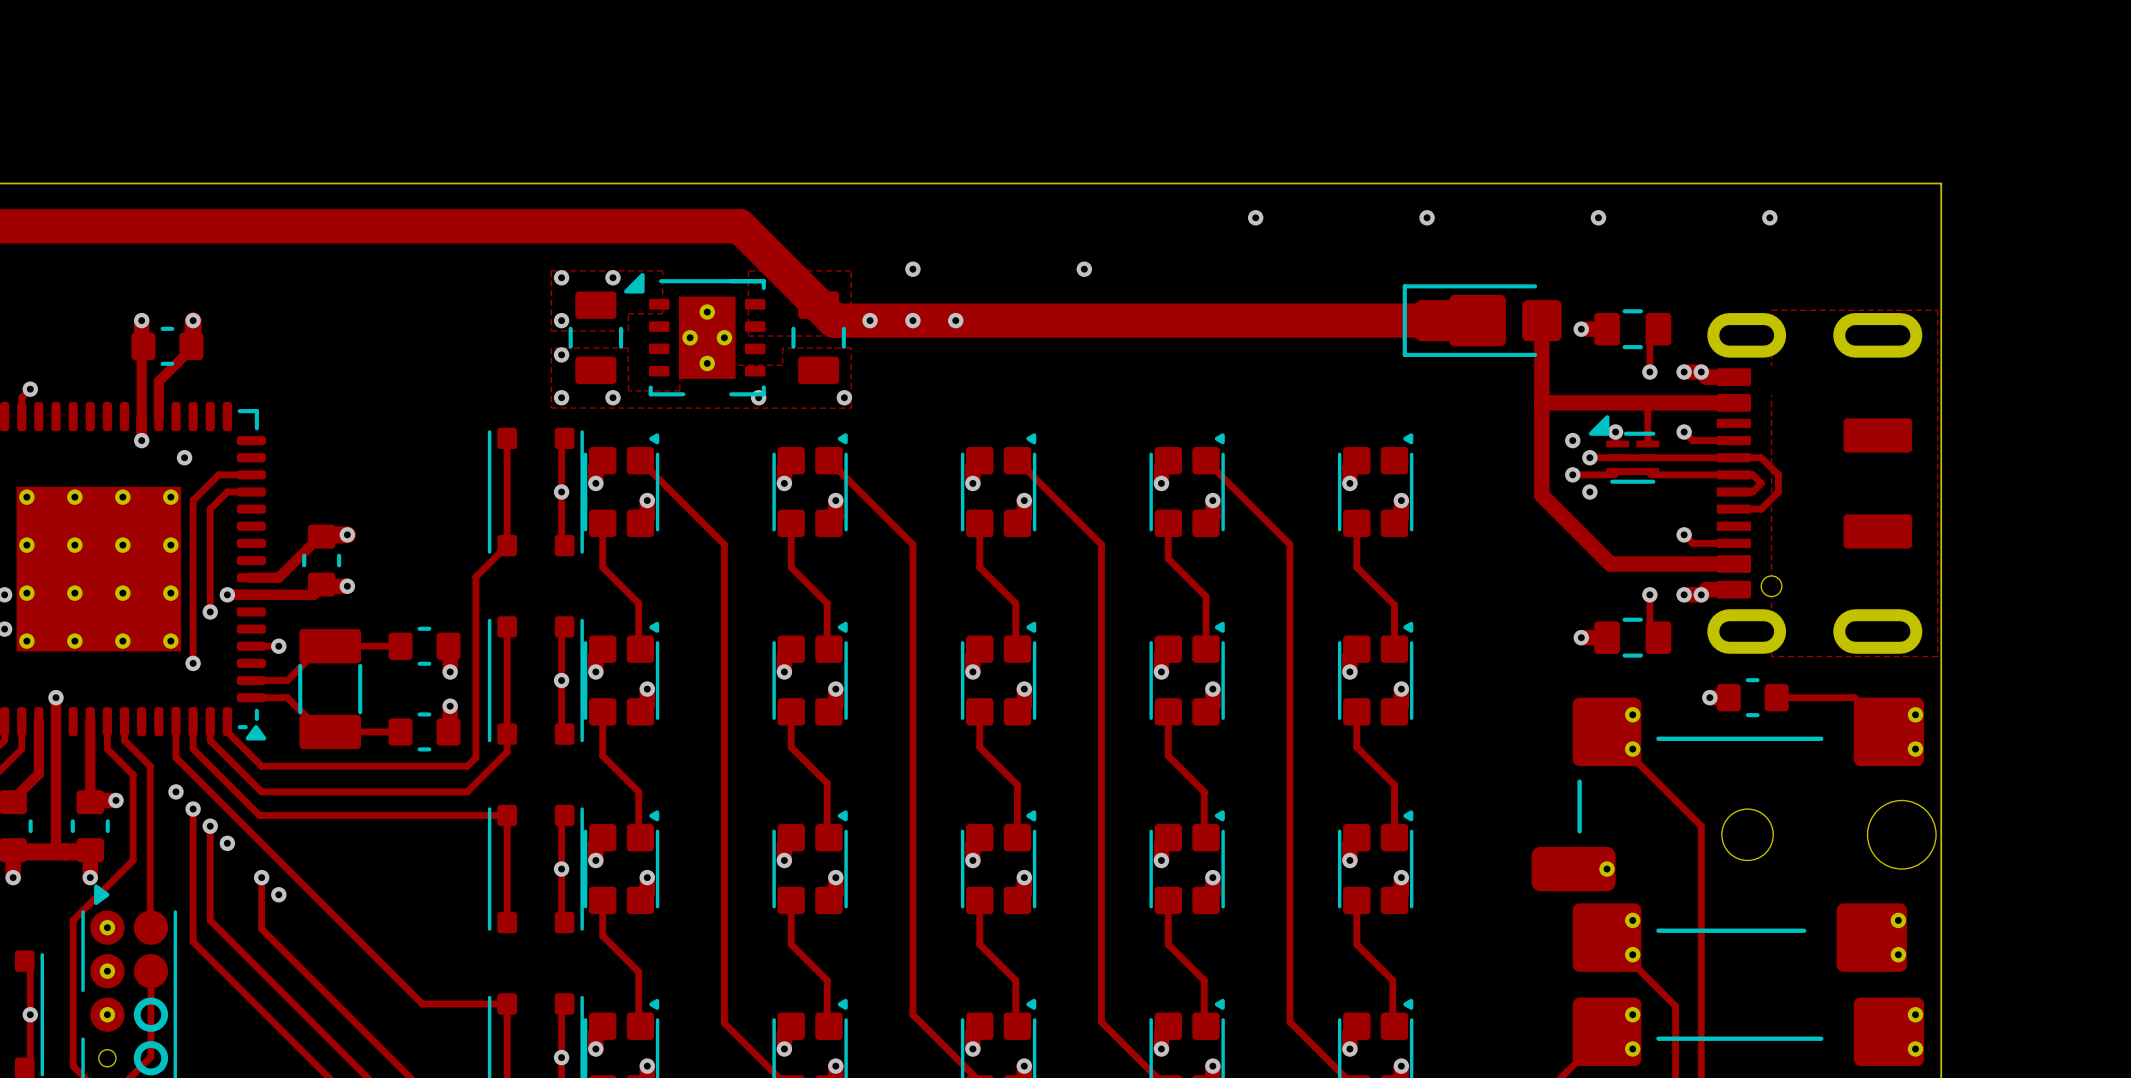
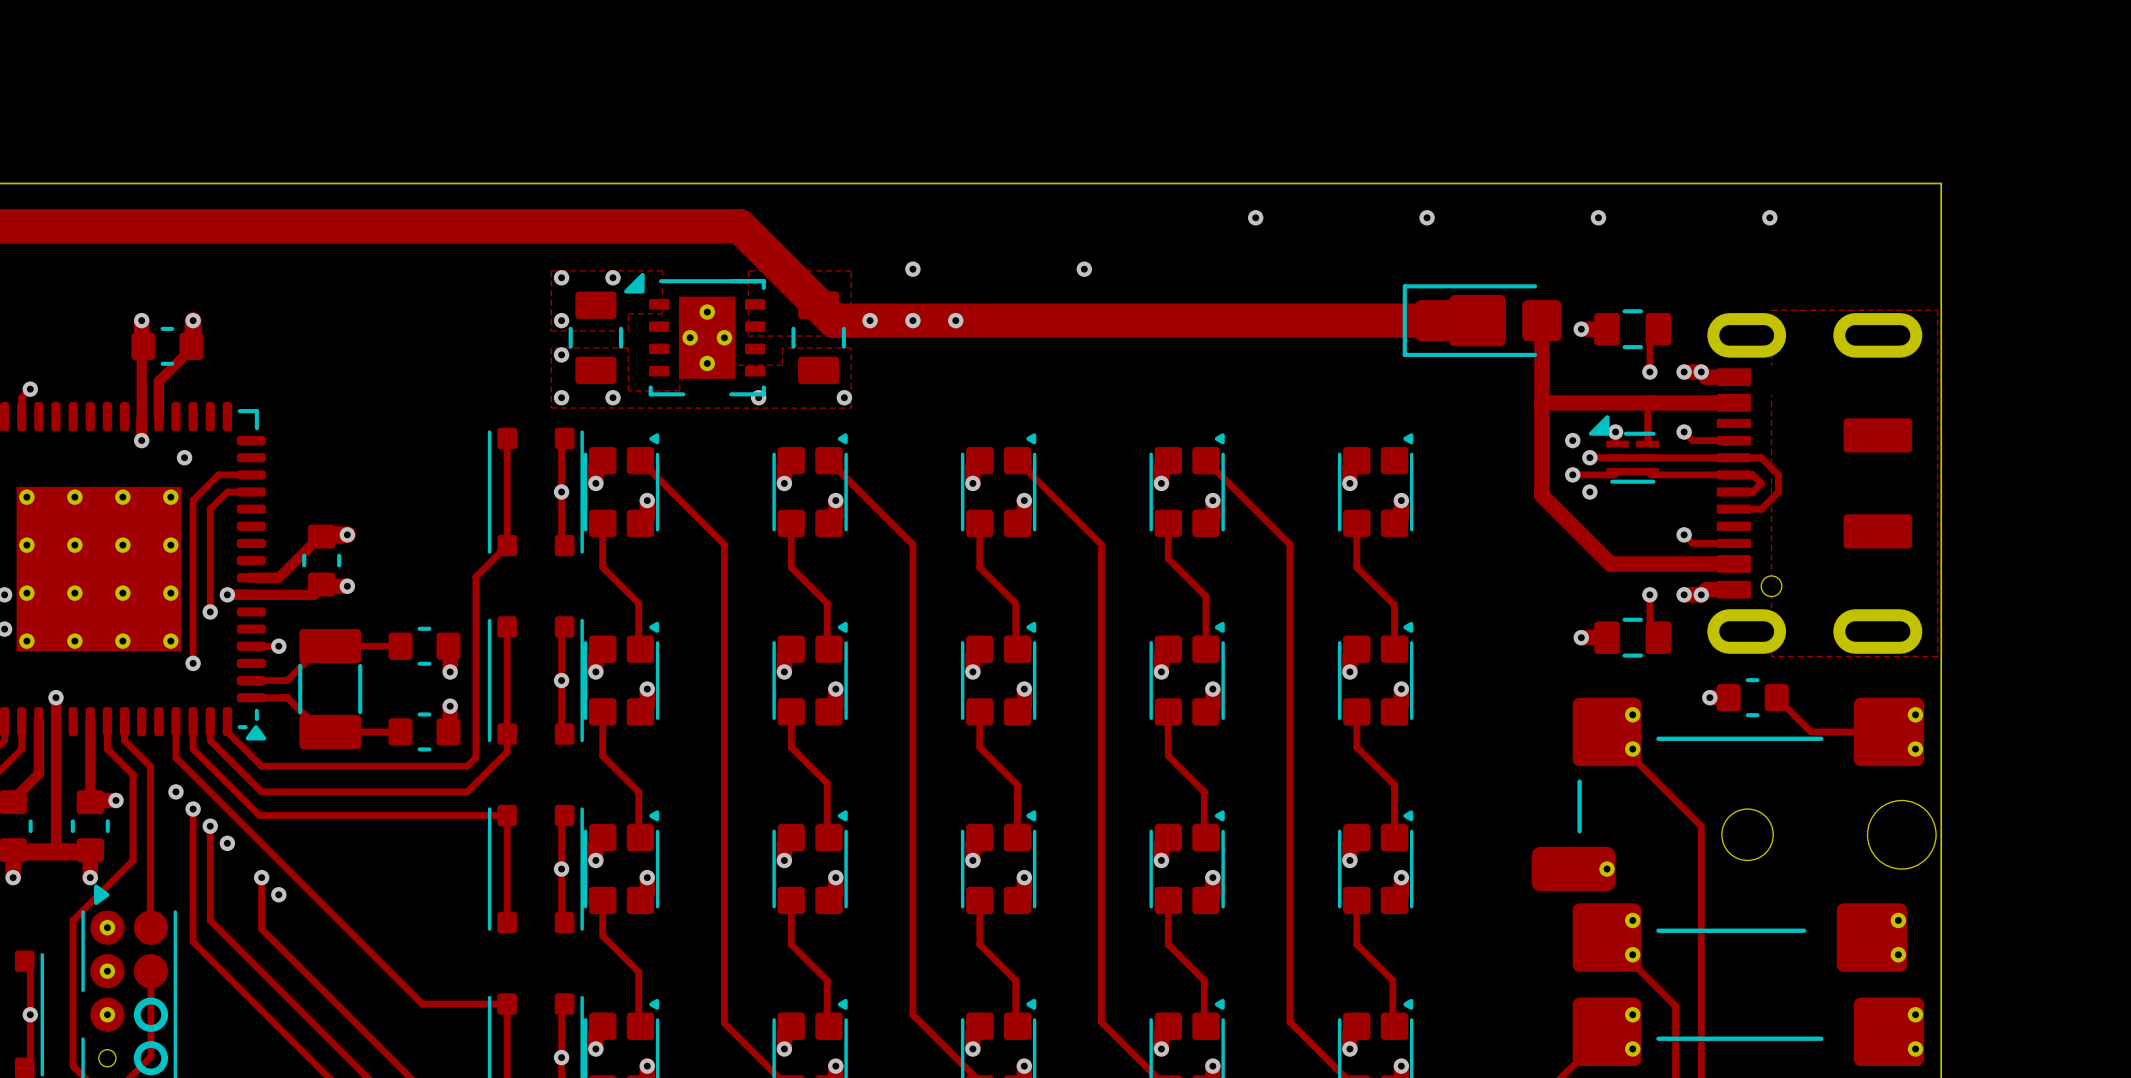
track: (1776, 697) (1854, 697) (1888, 731) -> (1776, 697) (1810, 731) (1888, 731)

